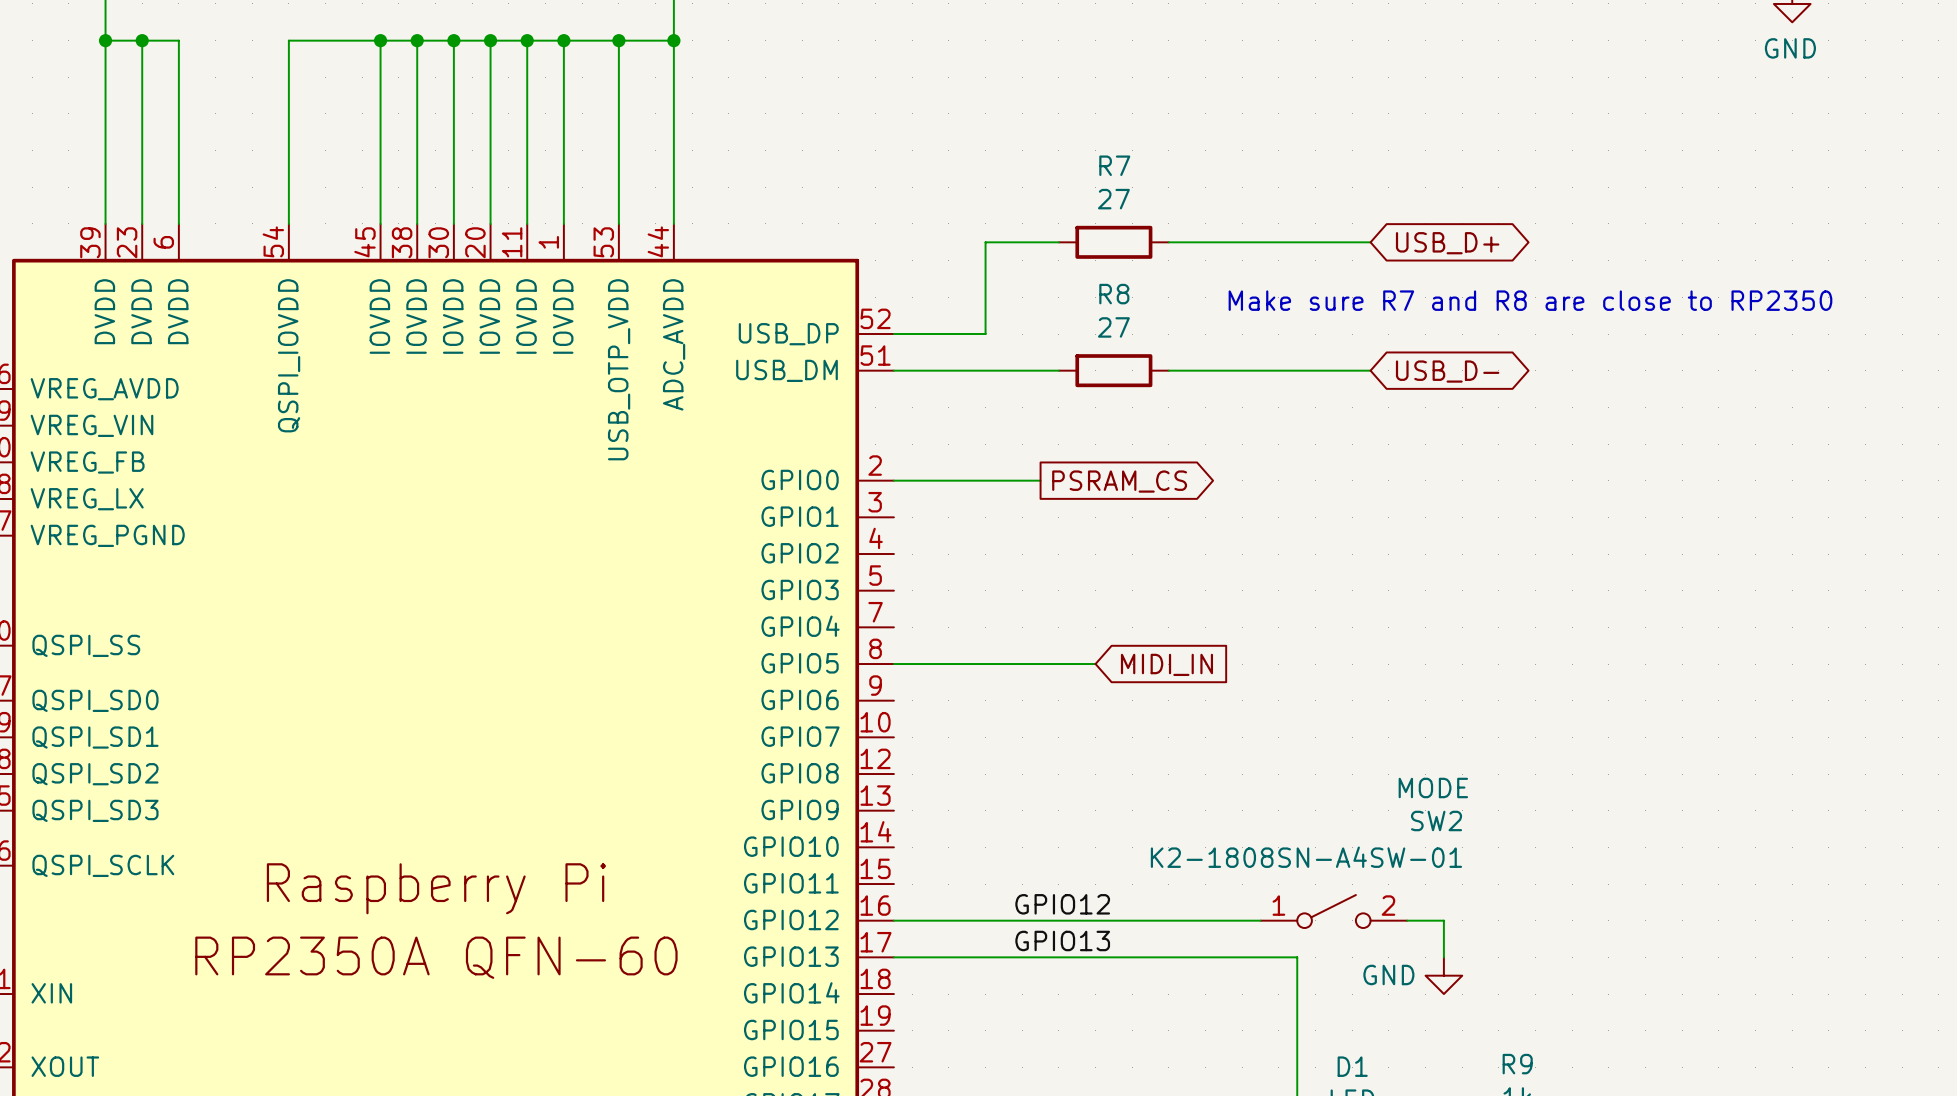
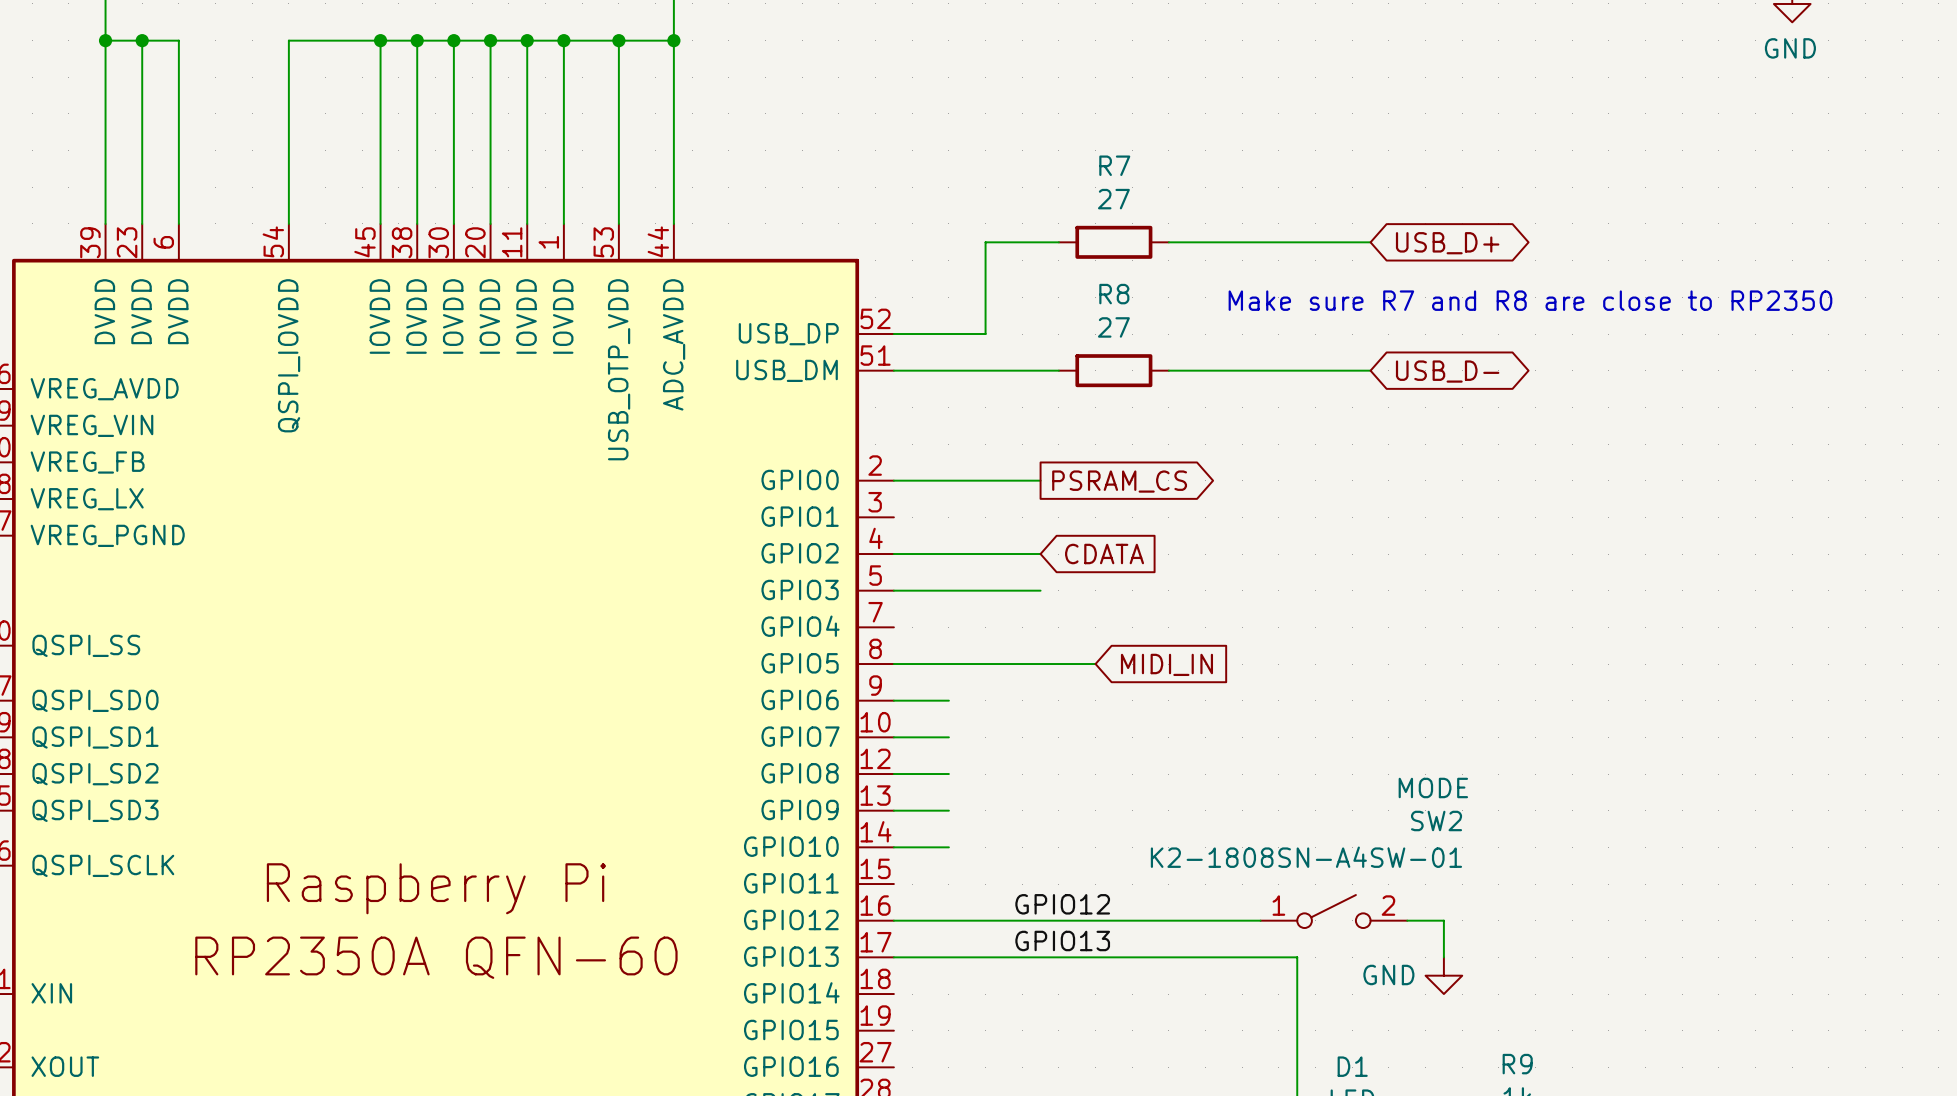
wire: none -> (893, 554) (1040, 554)
global label: none -> CDATA (1104, 554)
wire: none -> (893, 590) (1040, 590)
wire: none -> (893, 700) (948, 700)
wire: none -> (893, 737) (948, 737)
wire: none -> (893, 774) (948, 774)
wire: none -> (893, 810) (948, 810)
wire: none -> (893, 847) (948, 847)

